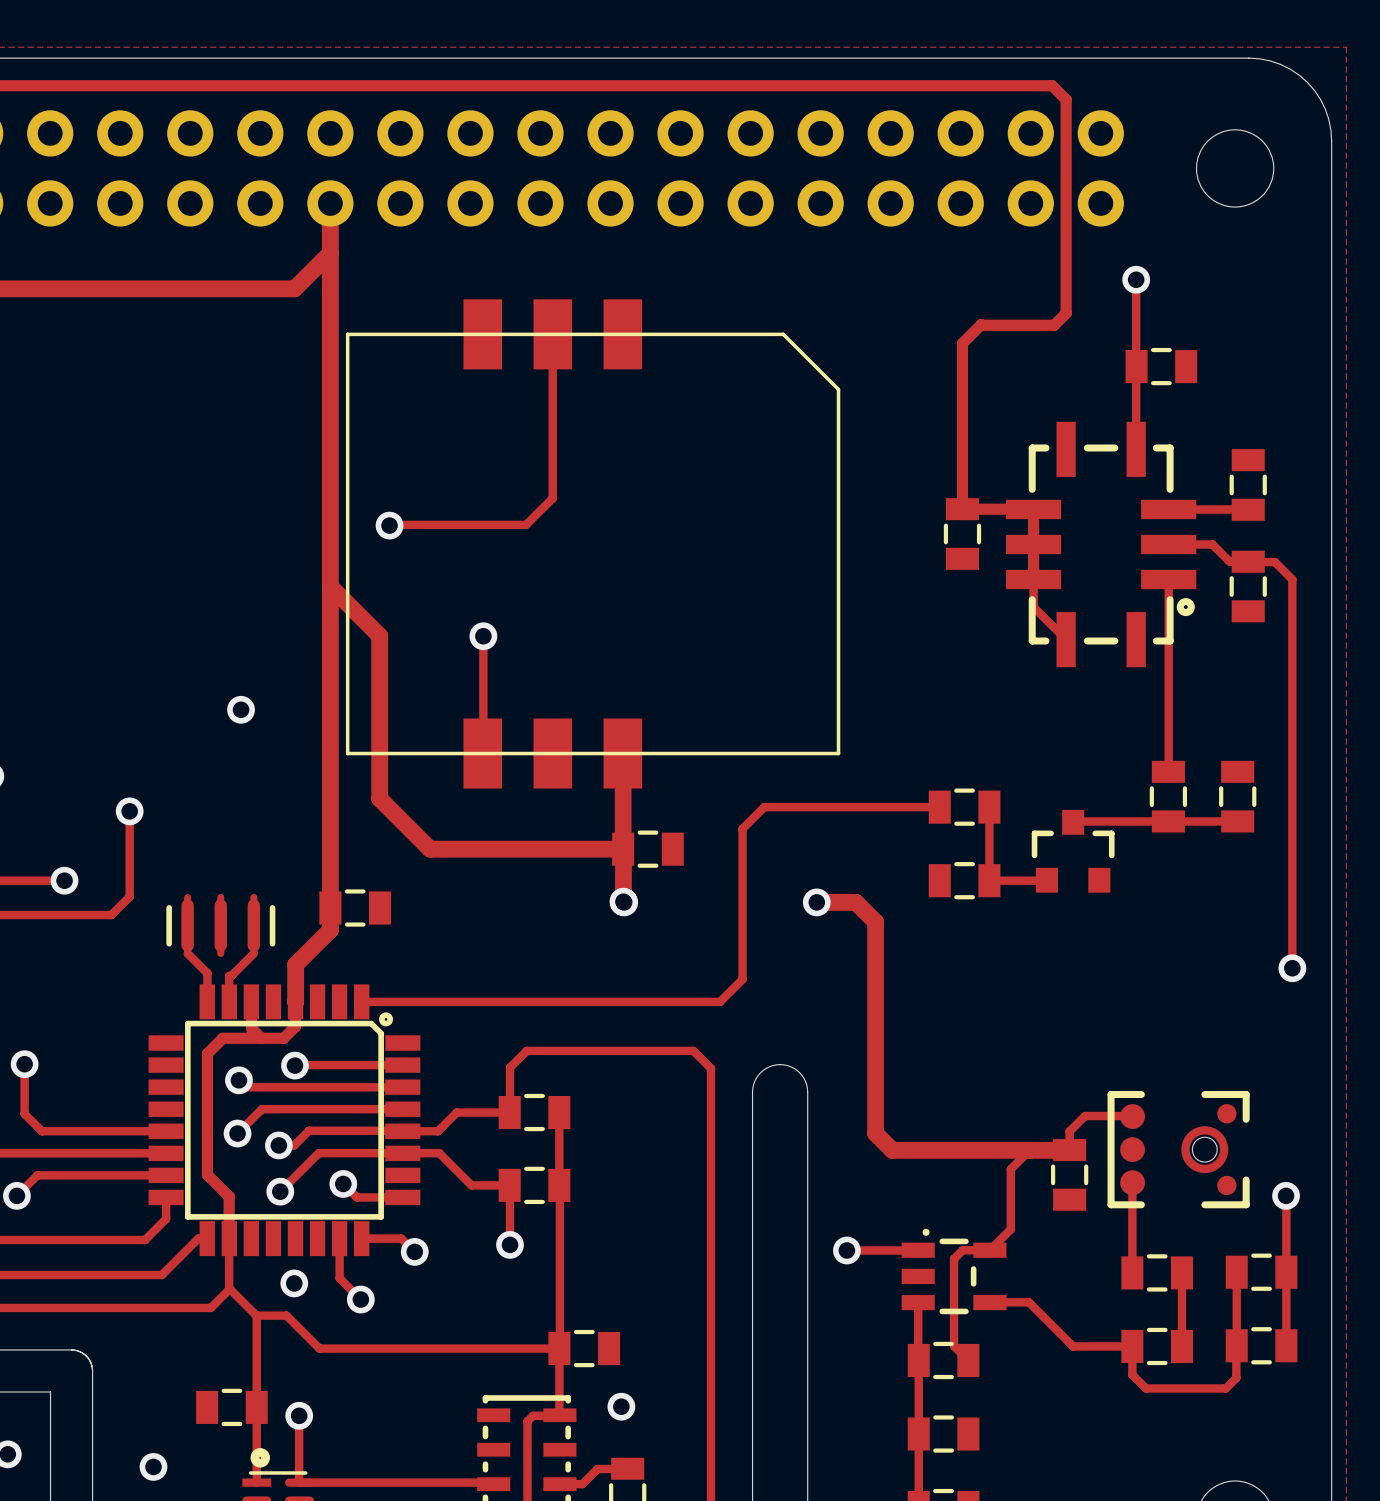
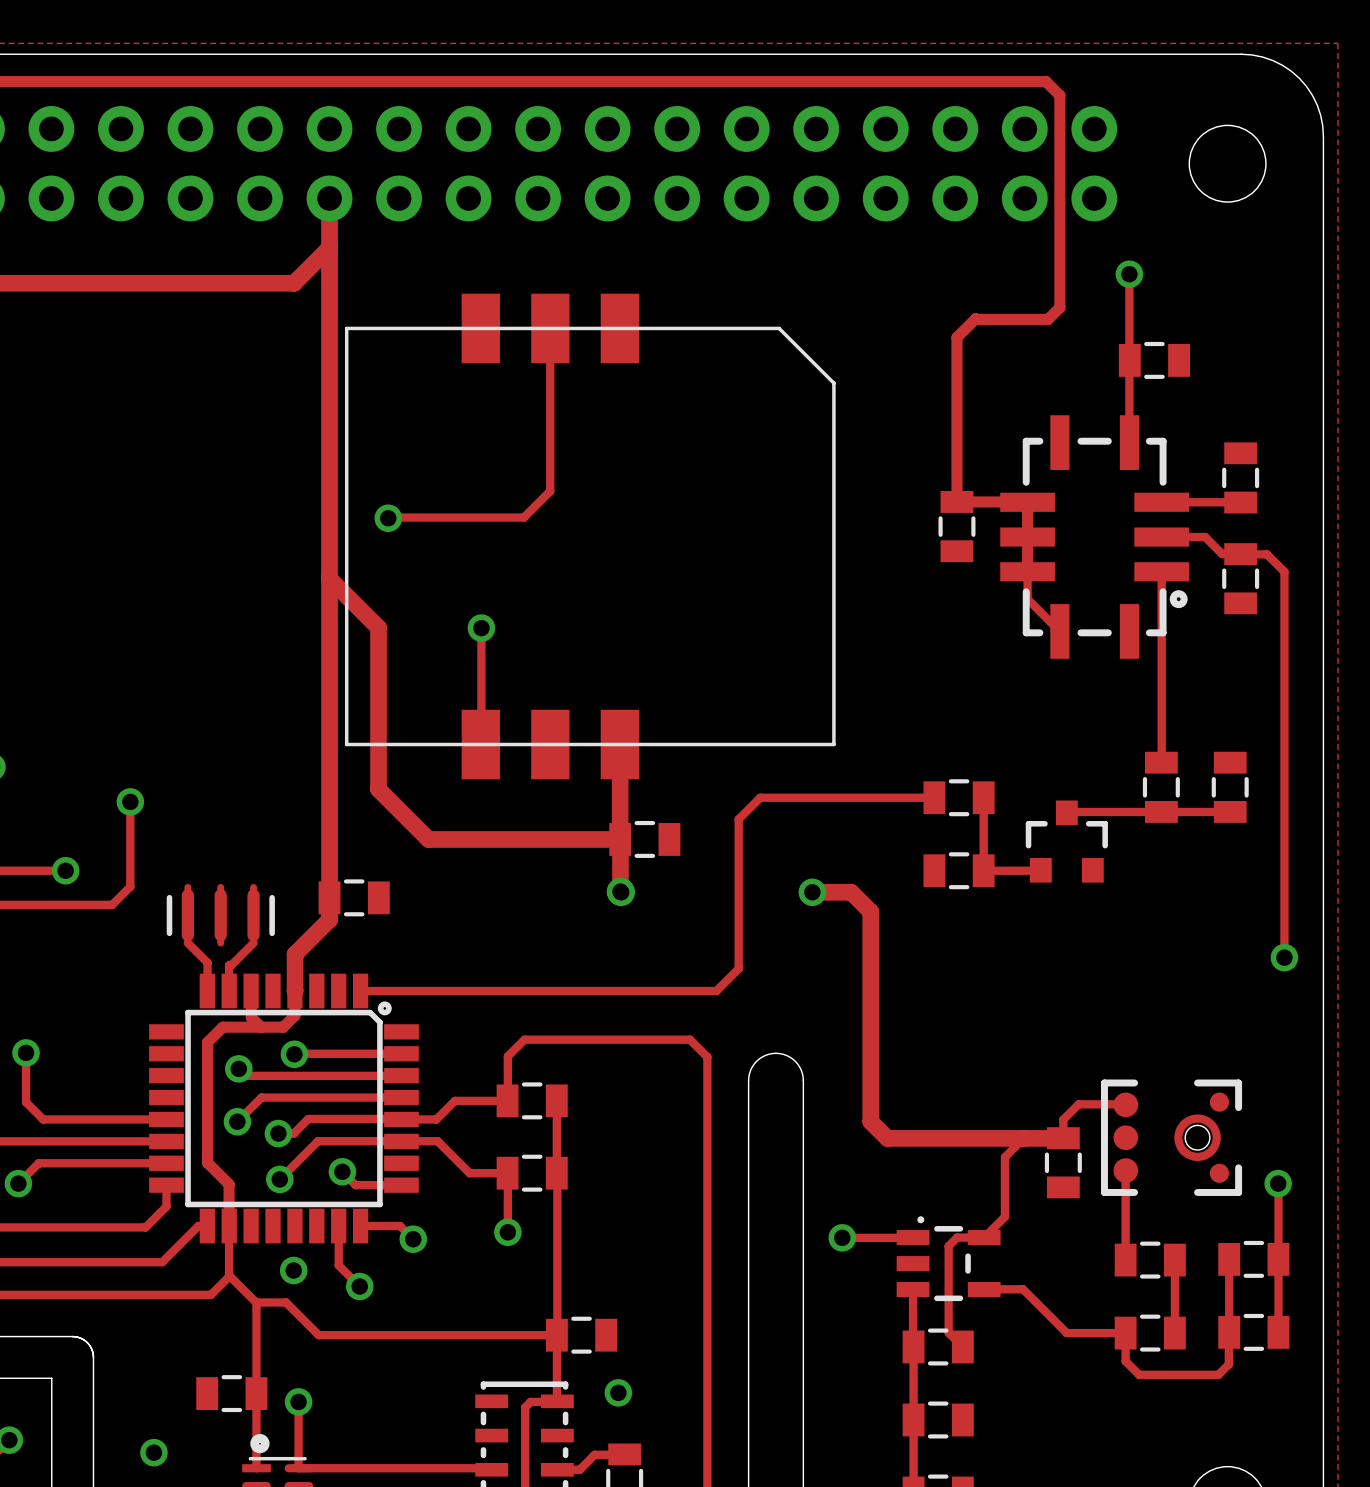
via: (241, 709) -> none

